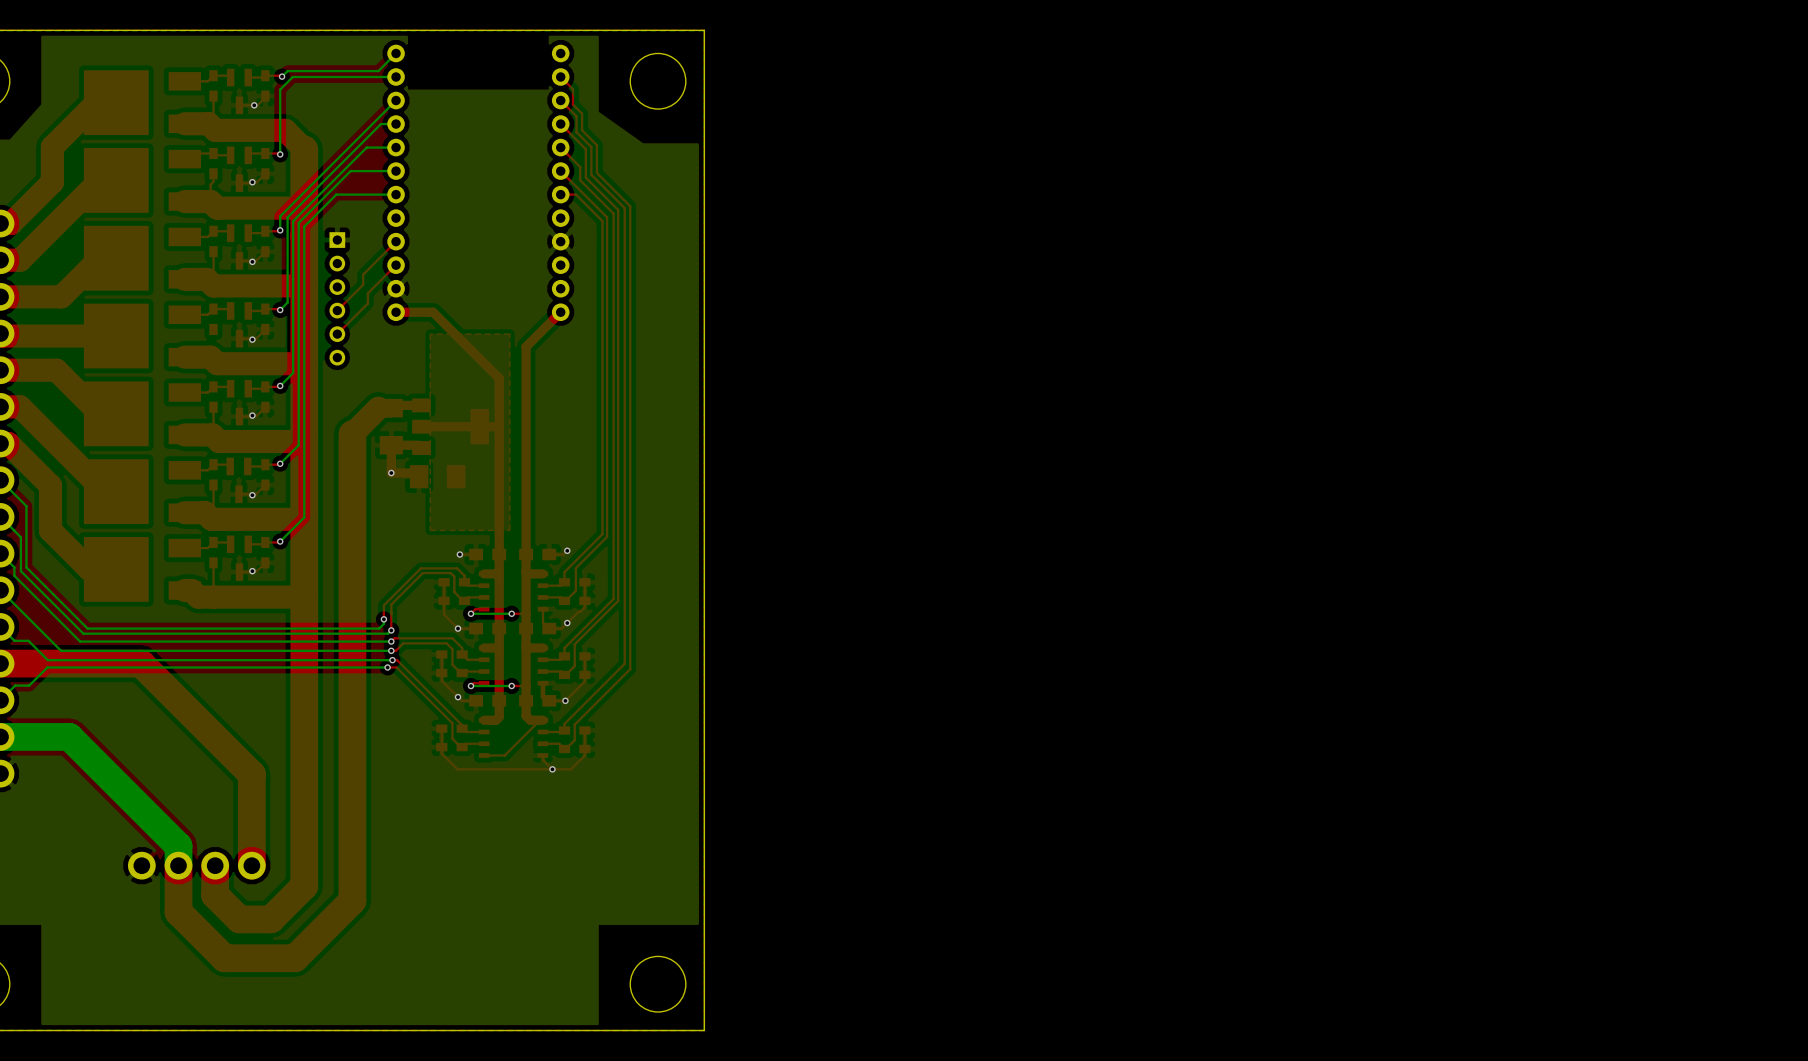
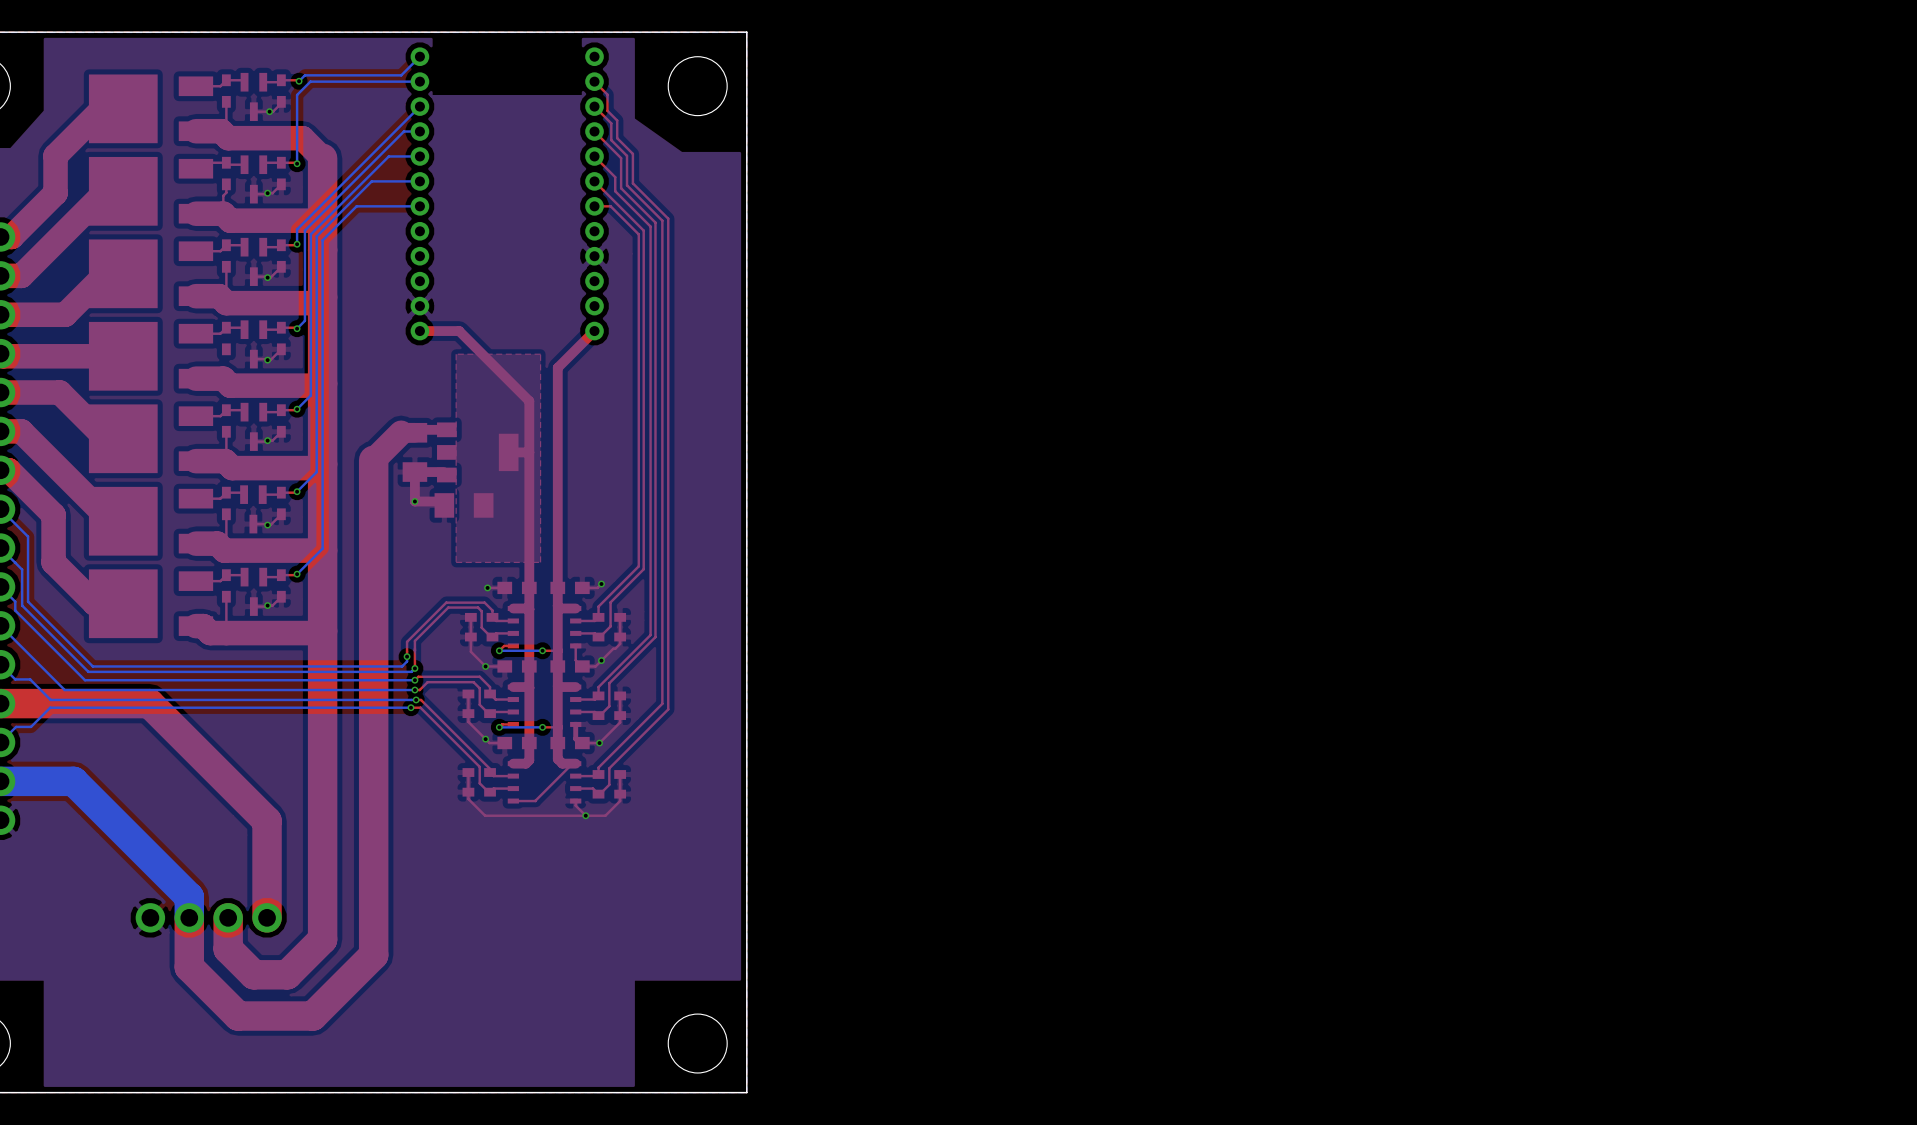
top track: (396, 241) (363, 274) (363, 284) (337, 310) -> none
top track: (396, 265) (367, 293) (367, 303) (337, 334) -> none
part: (337, 298) -> none
top track: (479, 426) (421, 426) -> none

